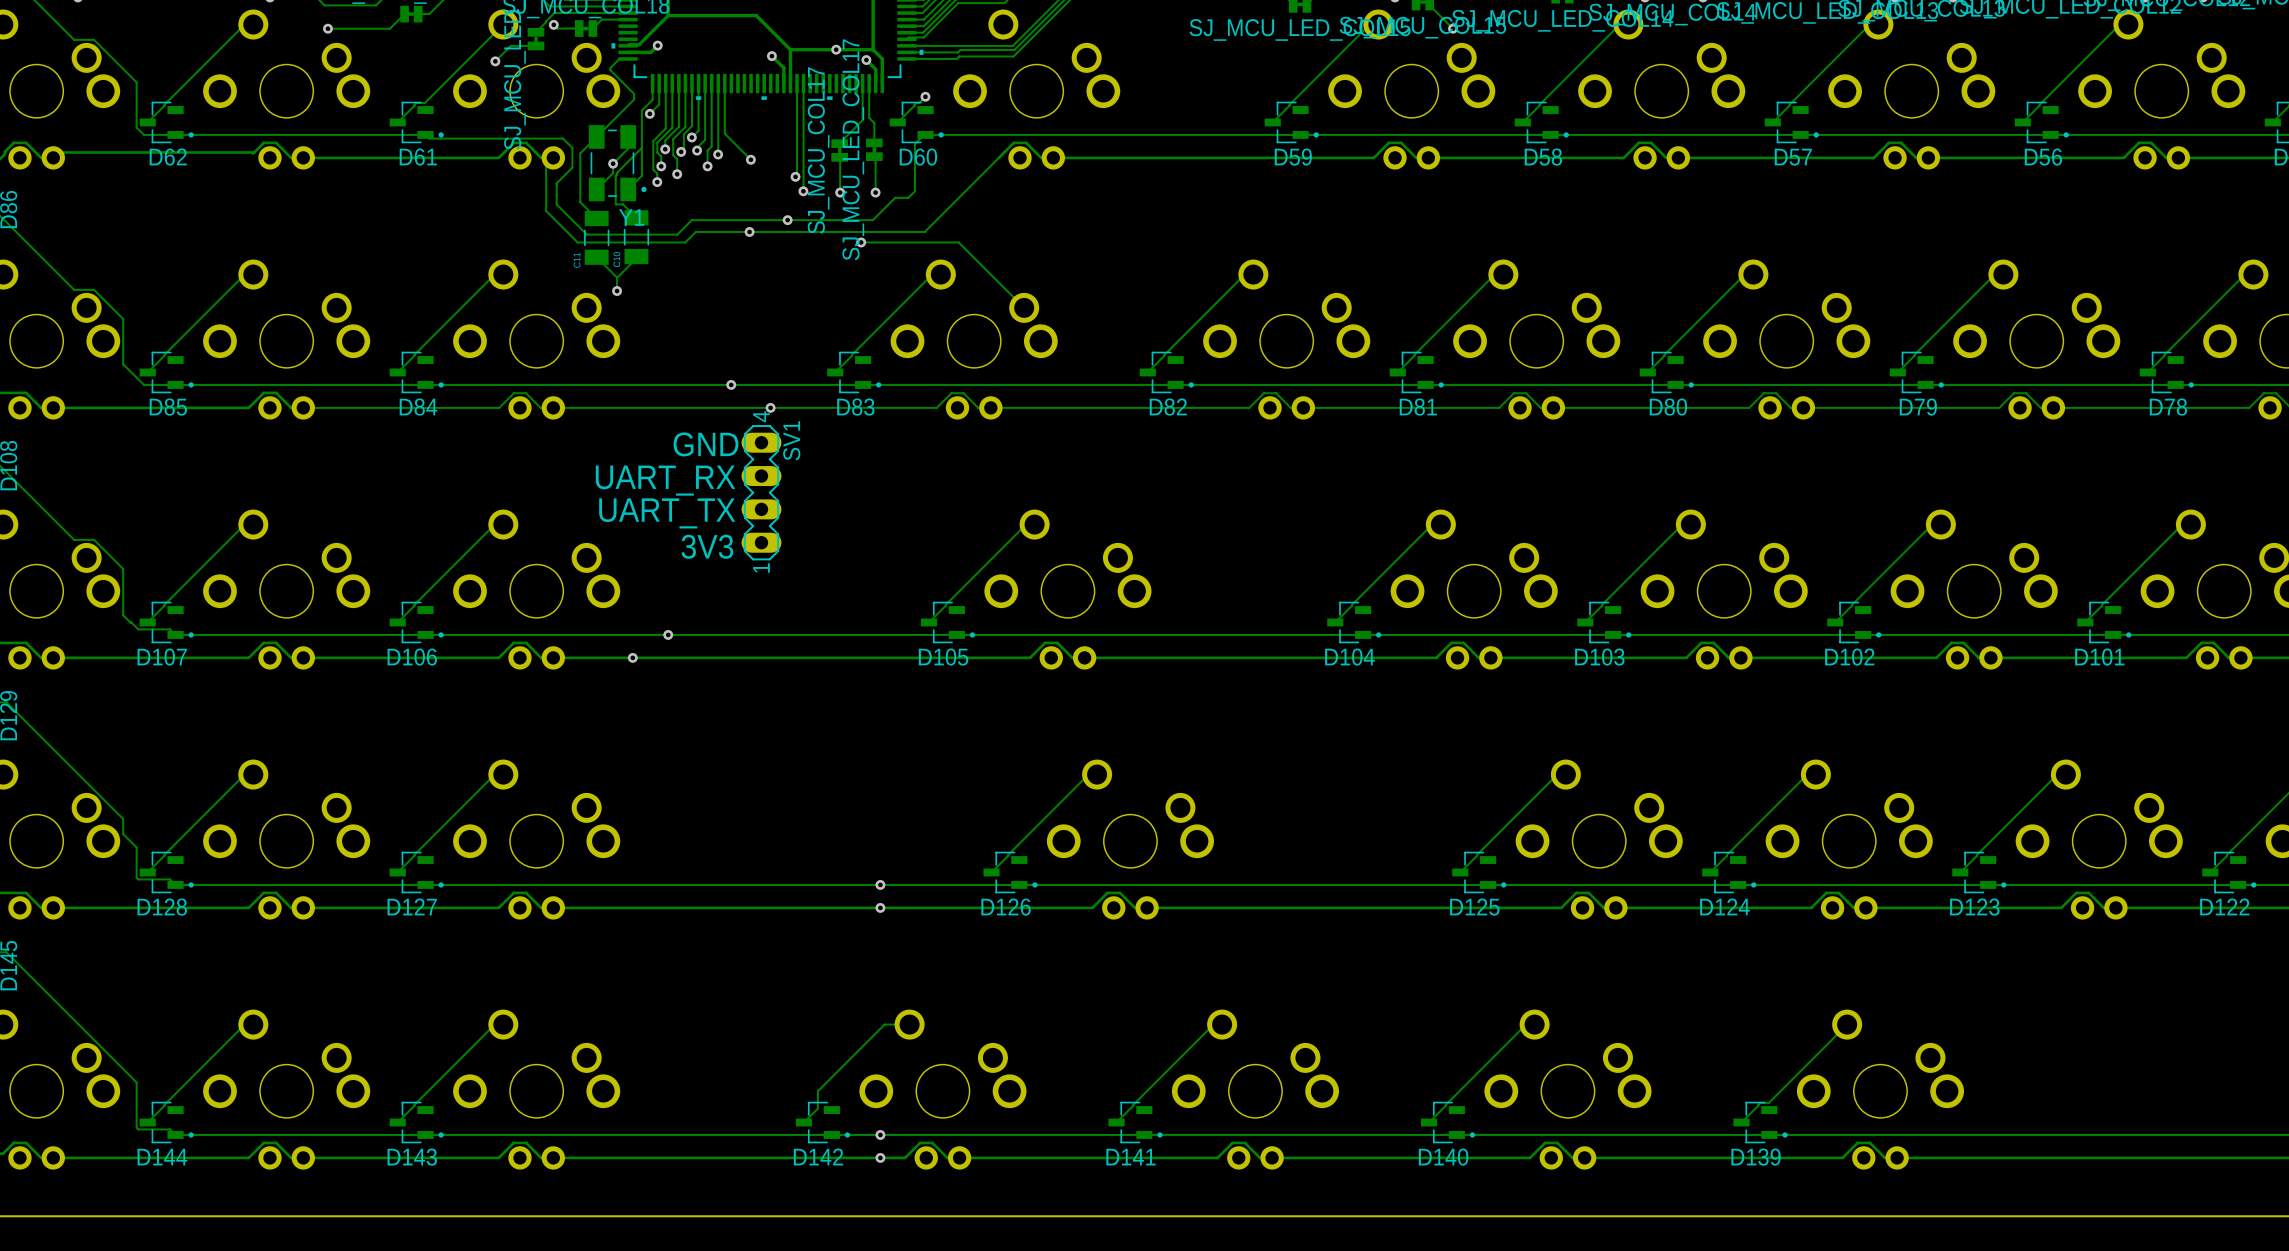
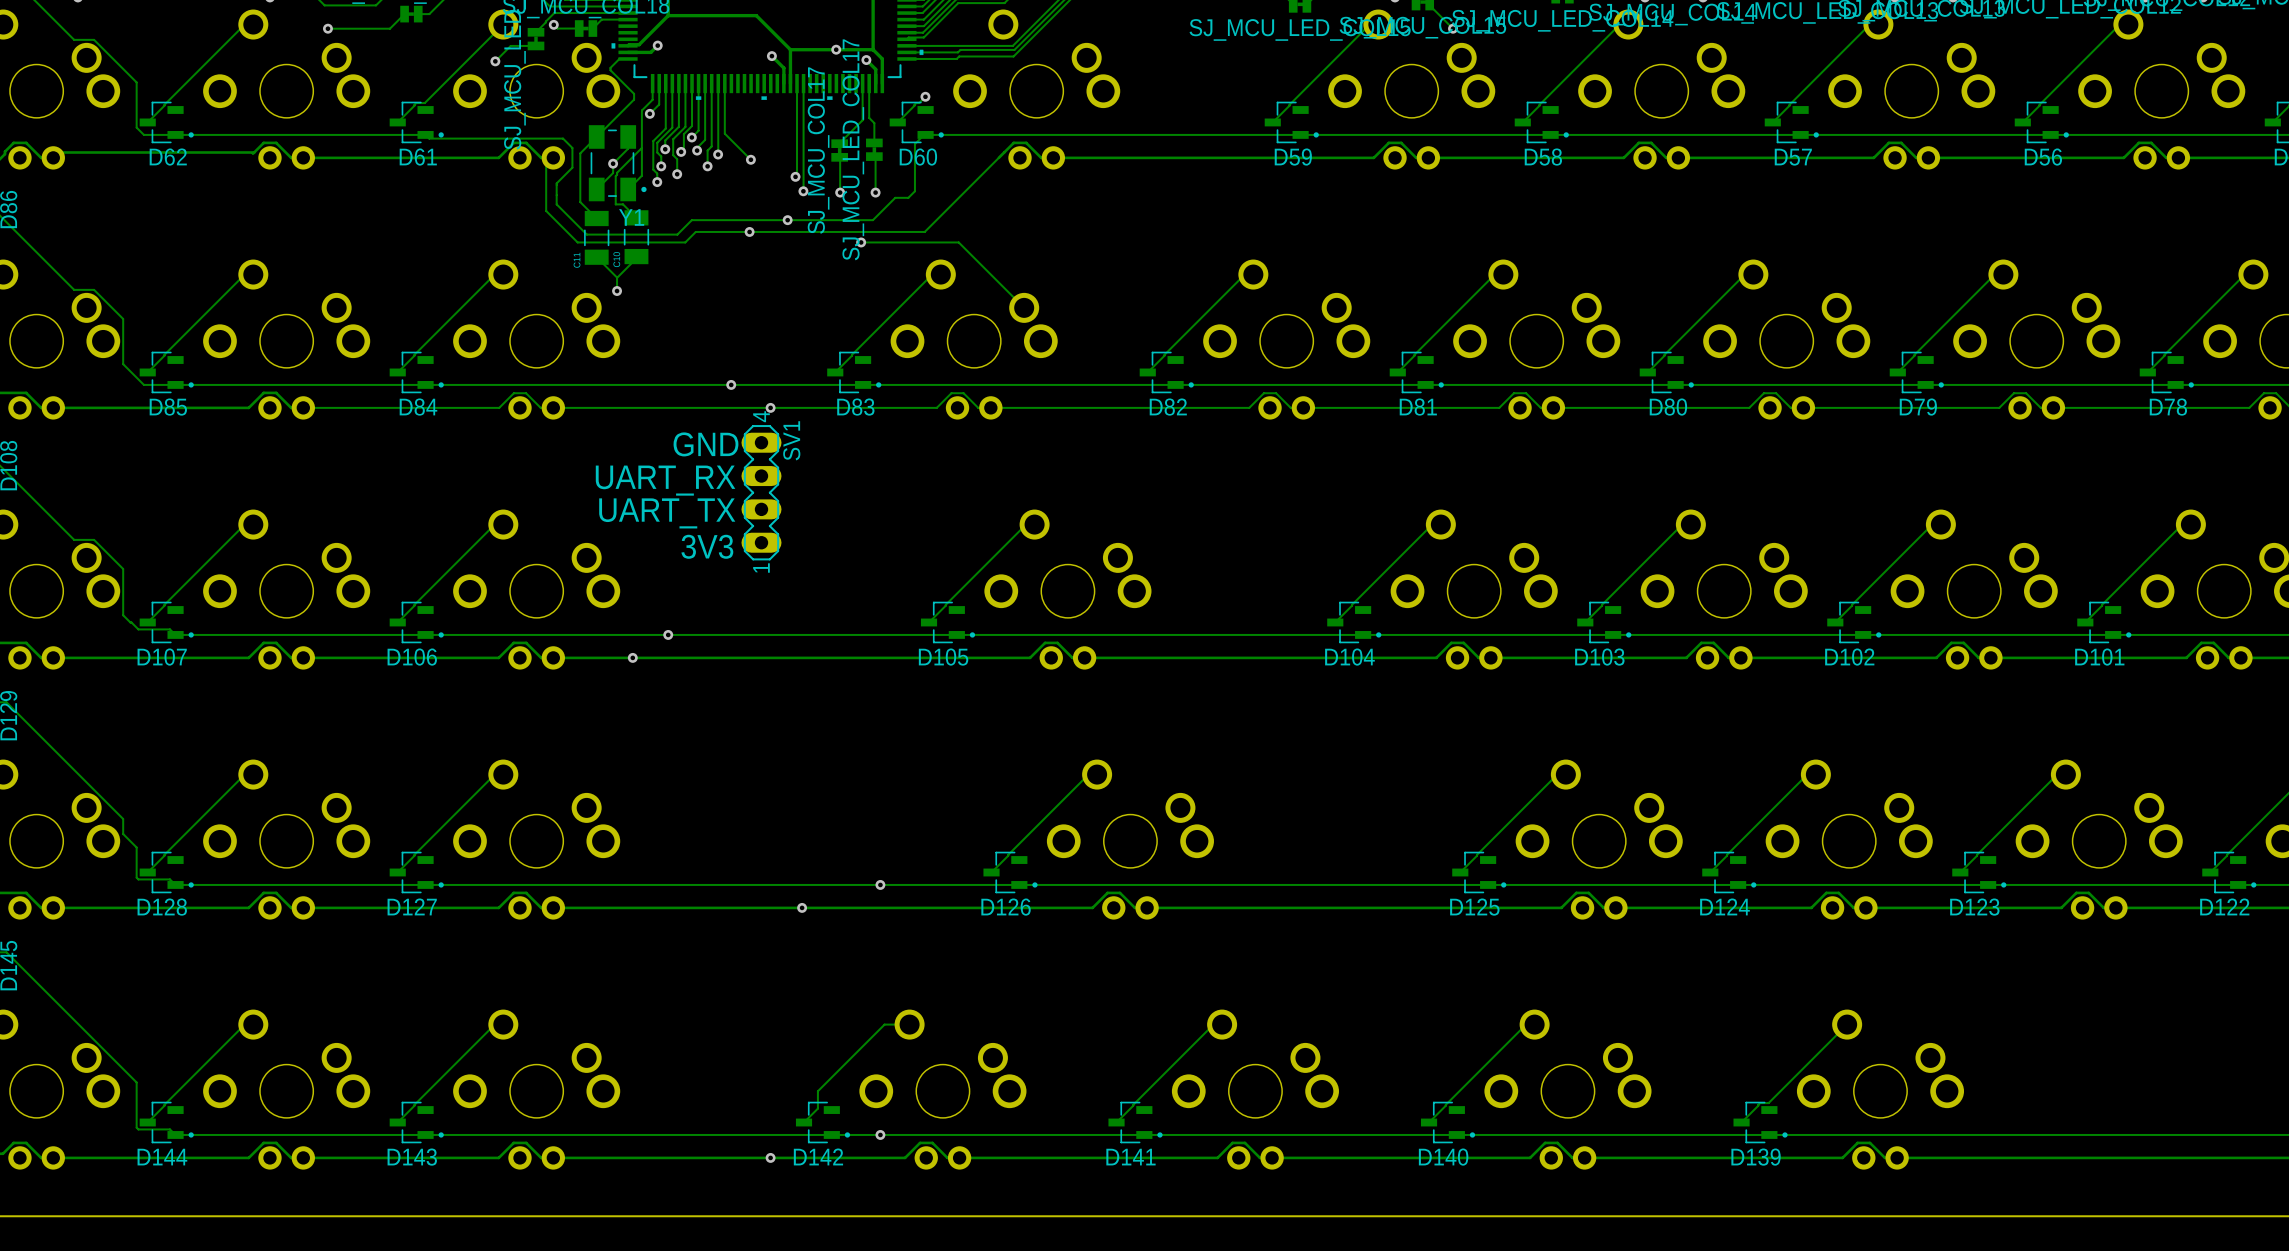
via position: (880, 907) -> (802, 907)
via: none -> (770, 1157)
via: (880, 1157) -> none

